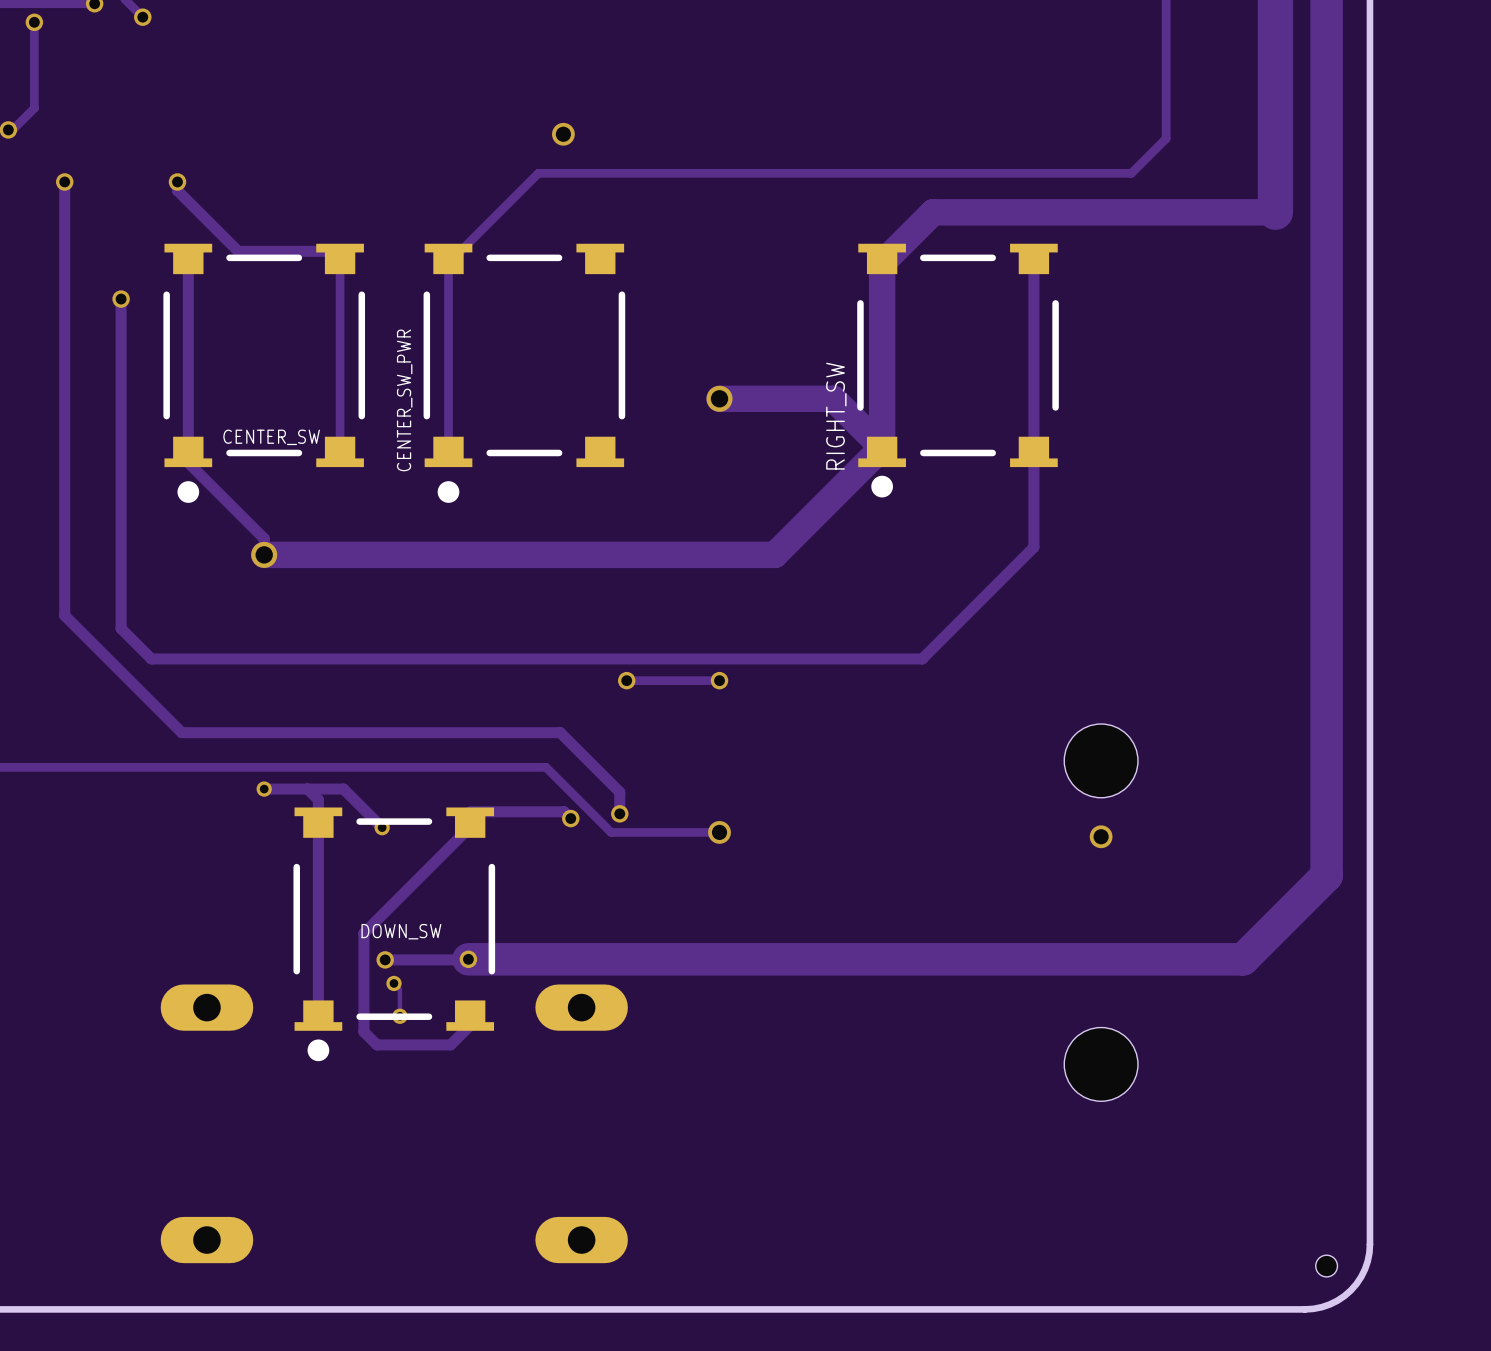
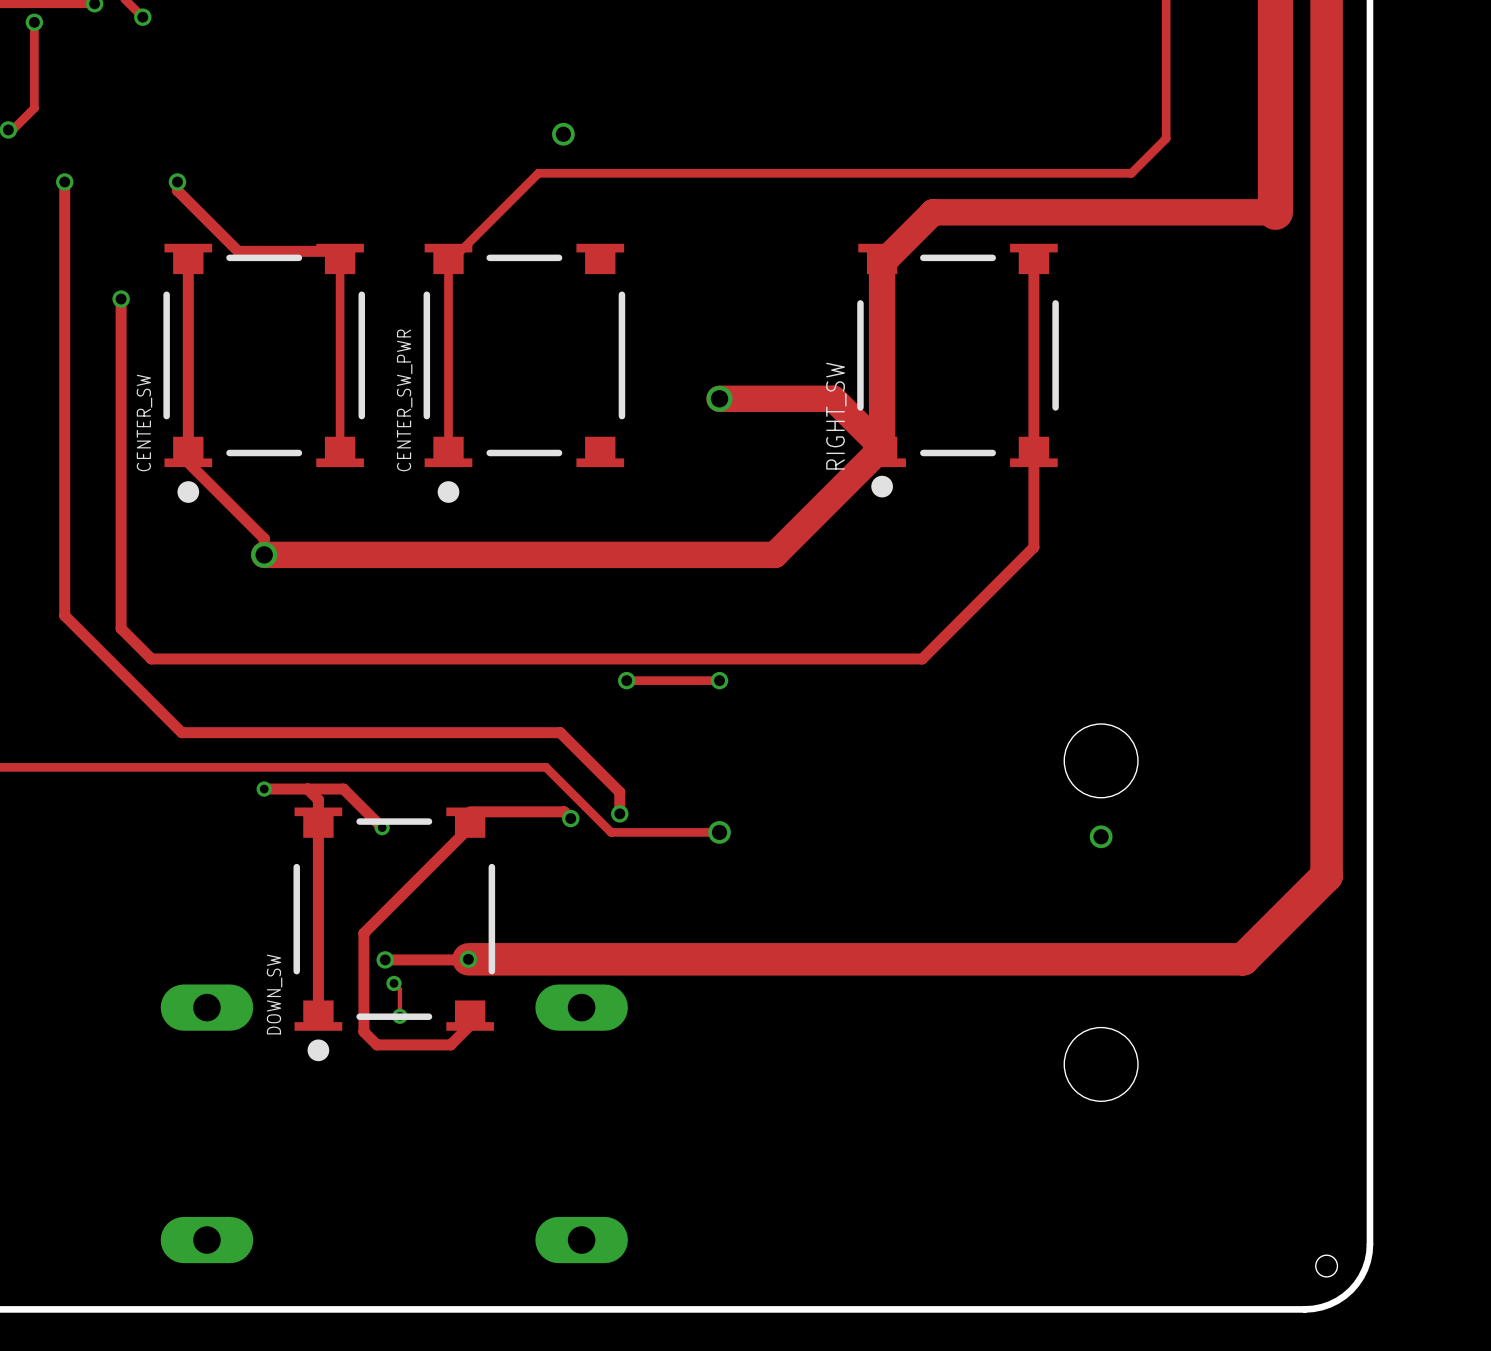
CENTER_SW name rotation: 0° (271, 437) -> 90° counterclockwise (144, 423)
CENTER_SW name position: CENTER_SW (271, 437) -> CENTER_SW (144, 423)
DOWN_SW name rotation: 0° (401, 931) -> 90° counterclockwise (274, 994)
DOWN_SW name position: DOWN_SW (401, 931) -> DOWN_SW (274, 994)

